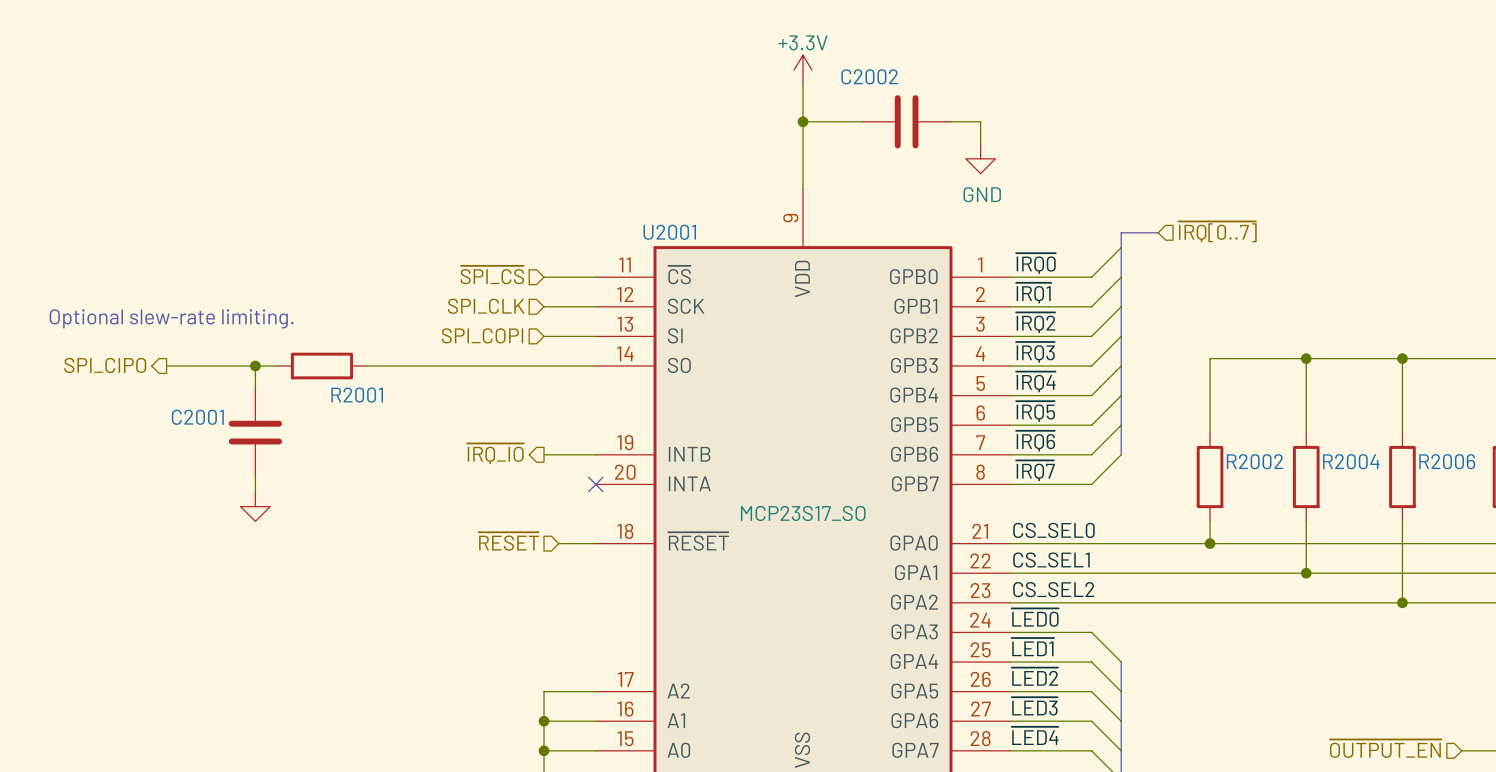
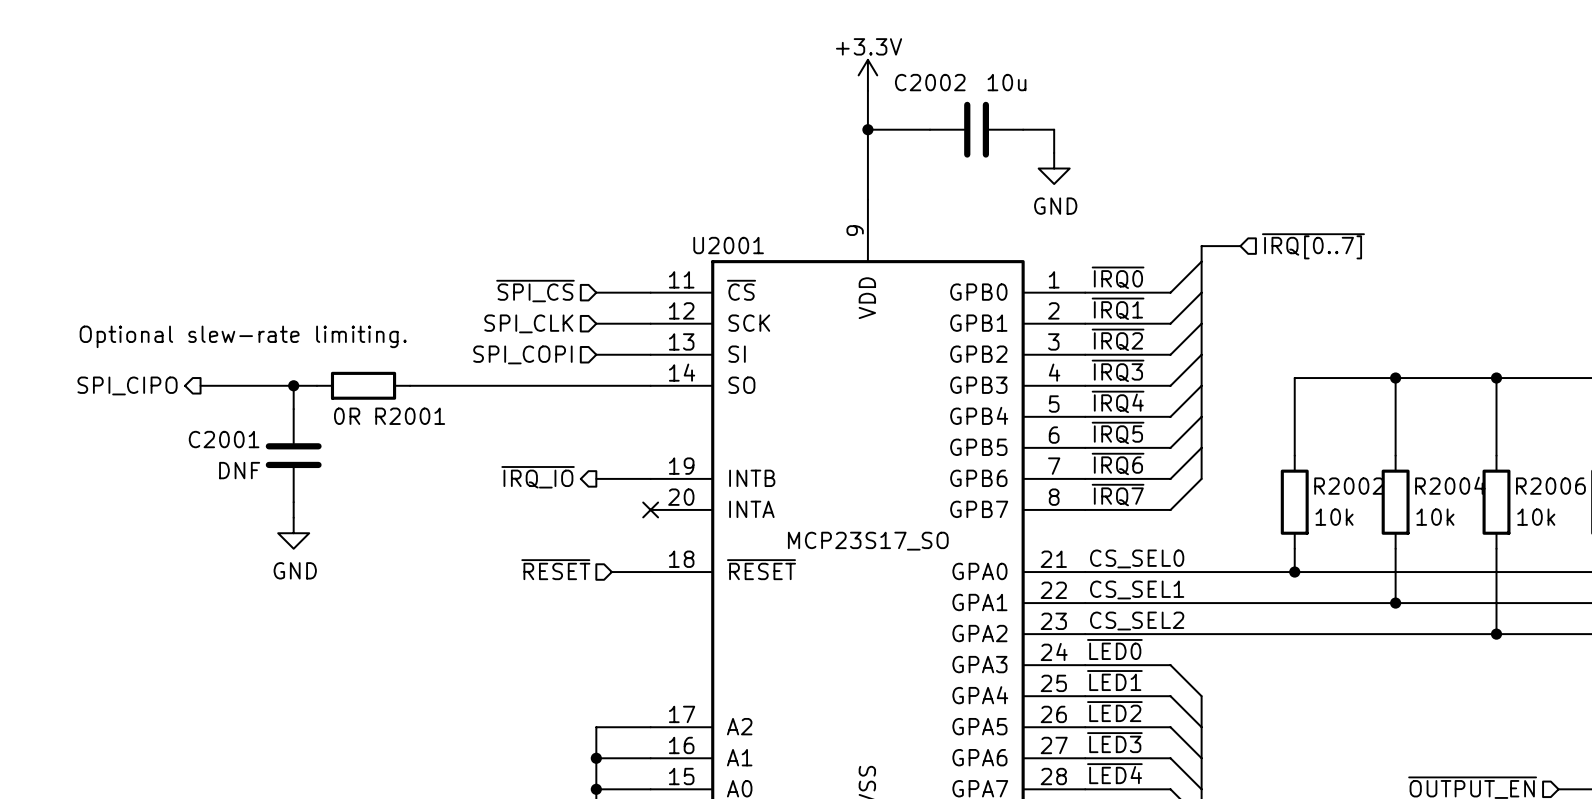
C2002 value: none -> 10u (1006, 82)
R2001 value: none -> 0R (347, 416)
C2001 value: none -> DNF (239, 470)
R2002 value: none -> 10k (1334, 517)
R2004 value: none -> 10k (1435, 517)
R2006 value: none -> 10k (1536, 517)
power symbol text: none -> GND (295, 570)

